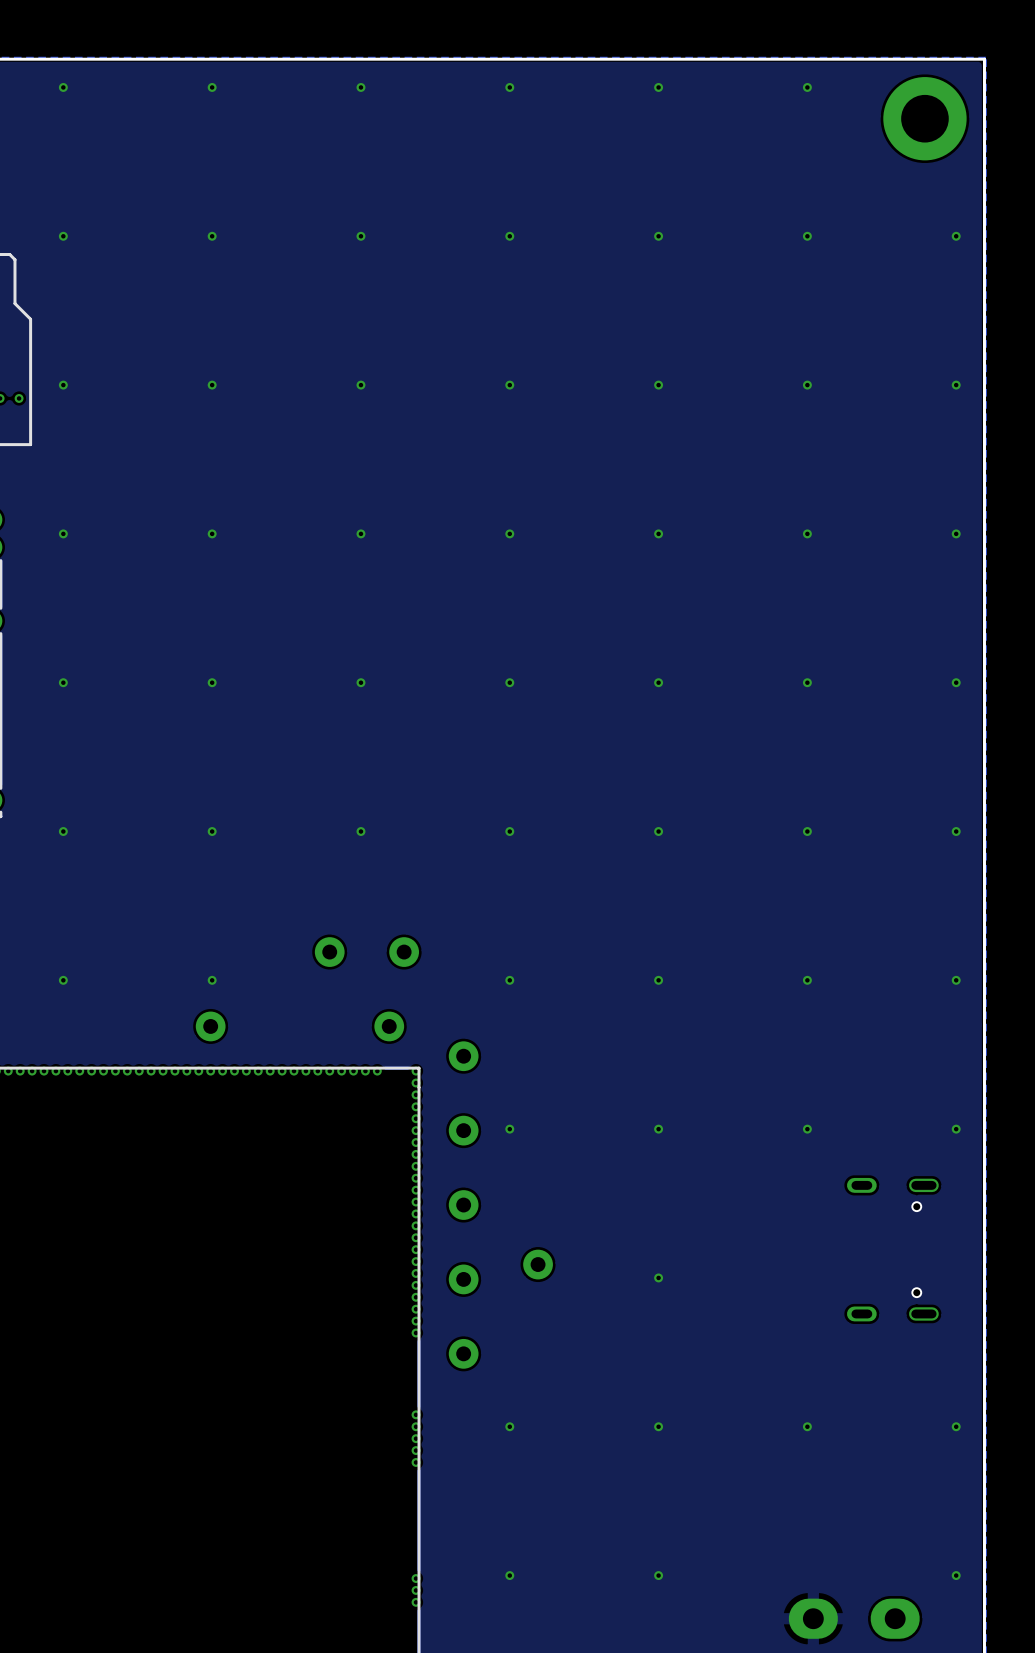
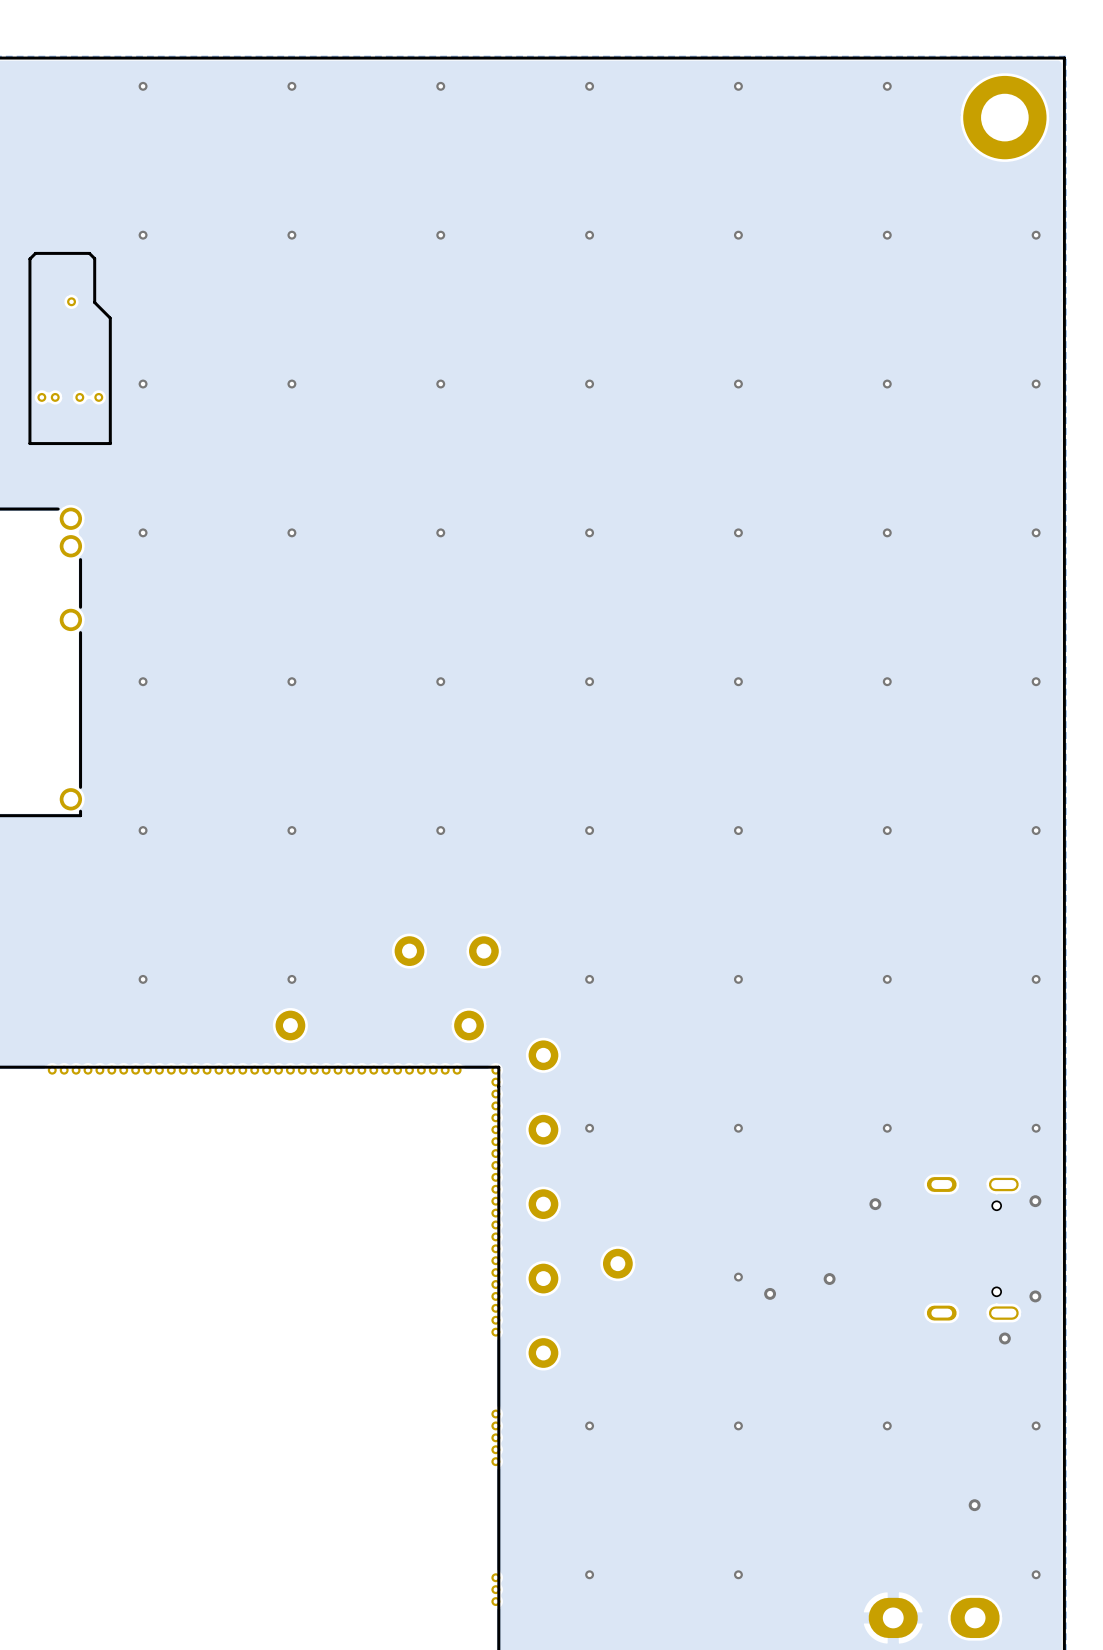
via: none -> (1035, 1201)
via: none -> (875, 1204)
via: none -> (829, 1279)
via: none -> (770, 1293)
via: none -> (1035, 1296)
via: none -> (1004, 1338)
via: none -> (974, 1505)

